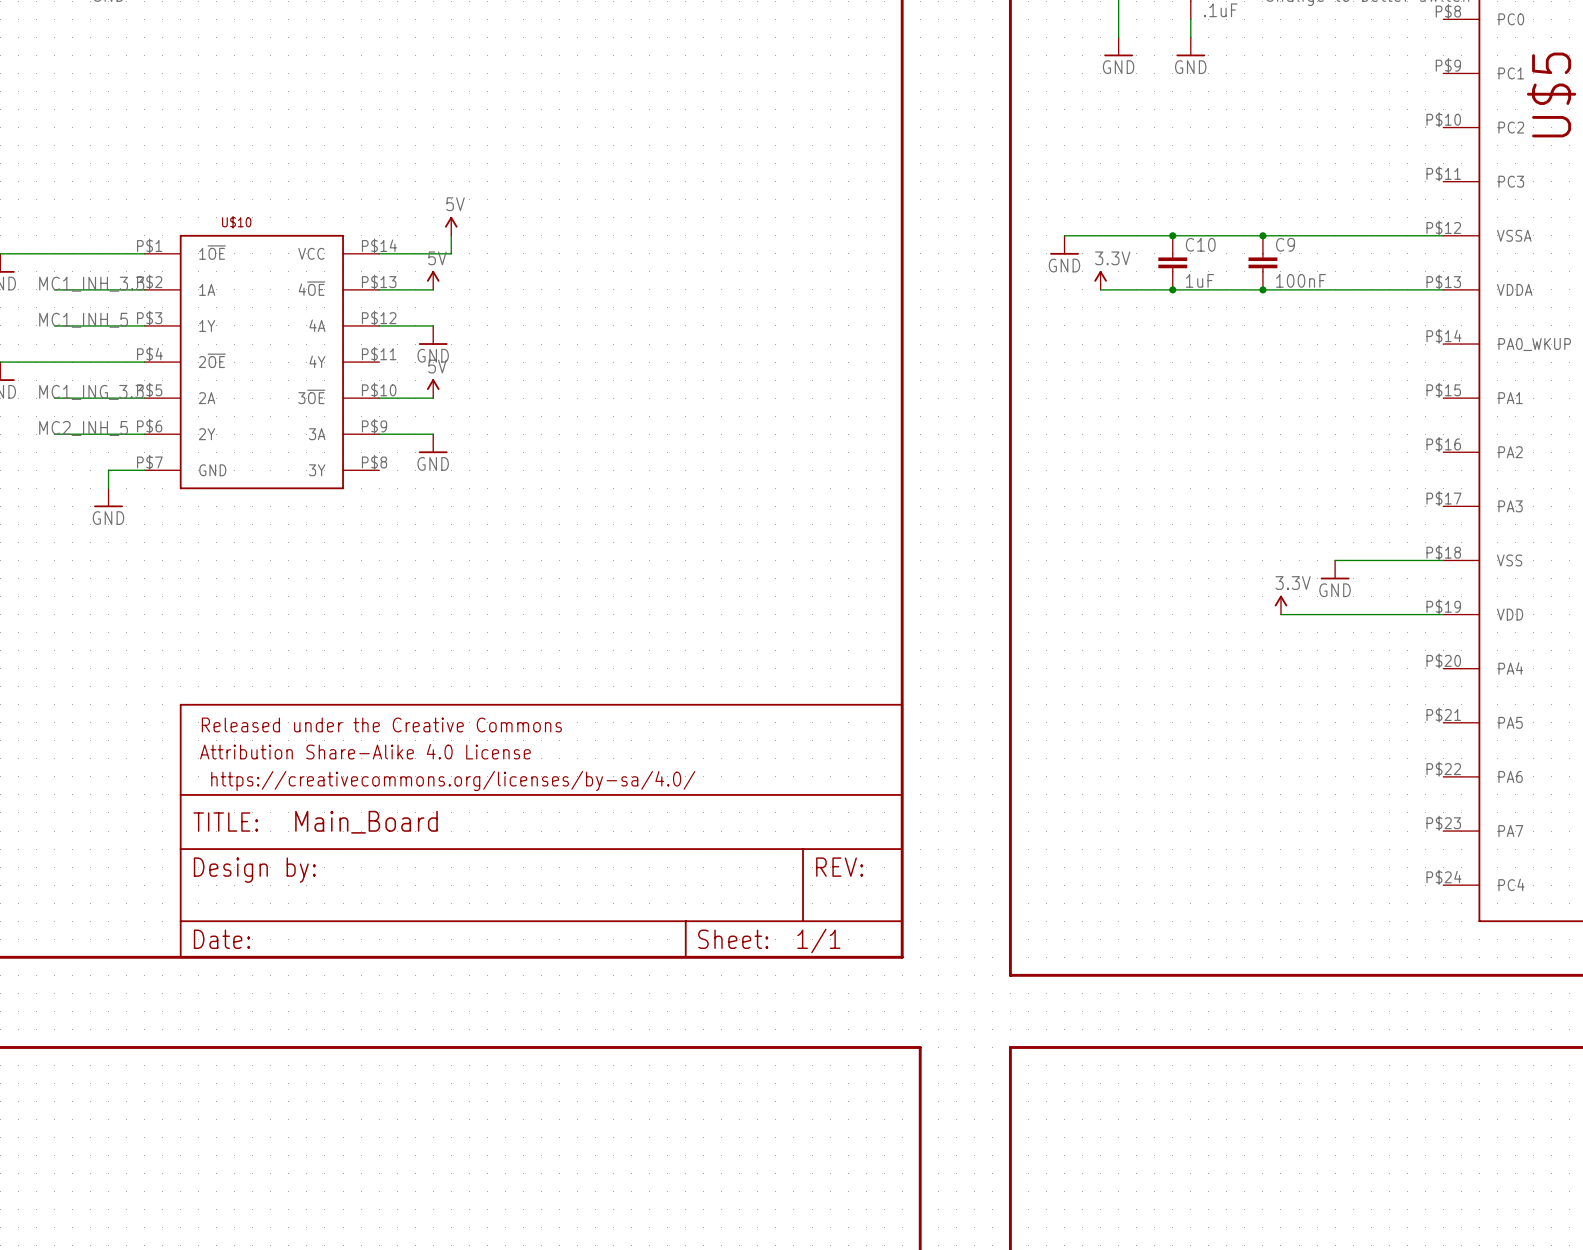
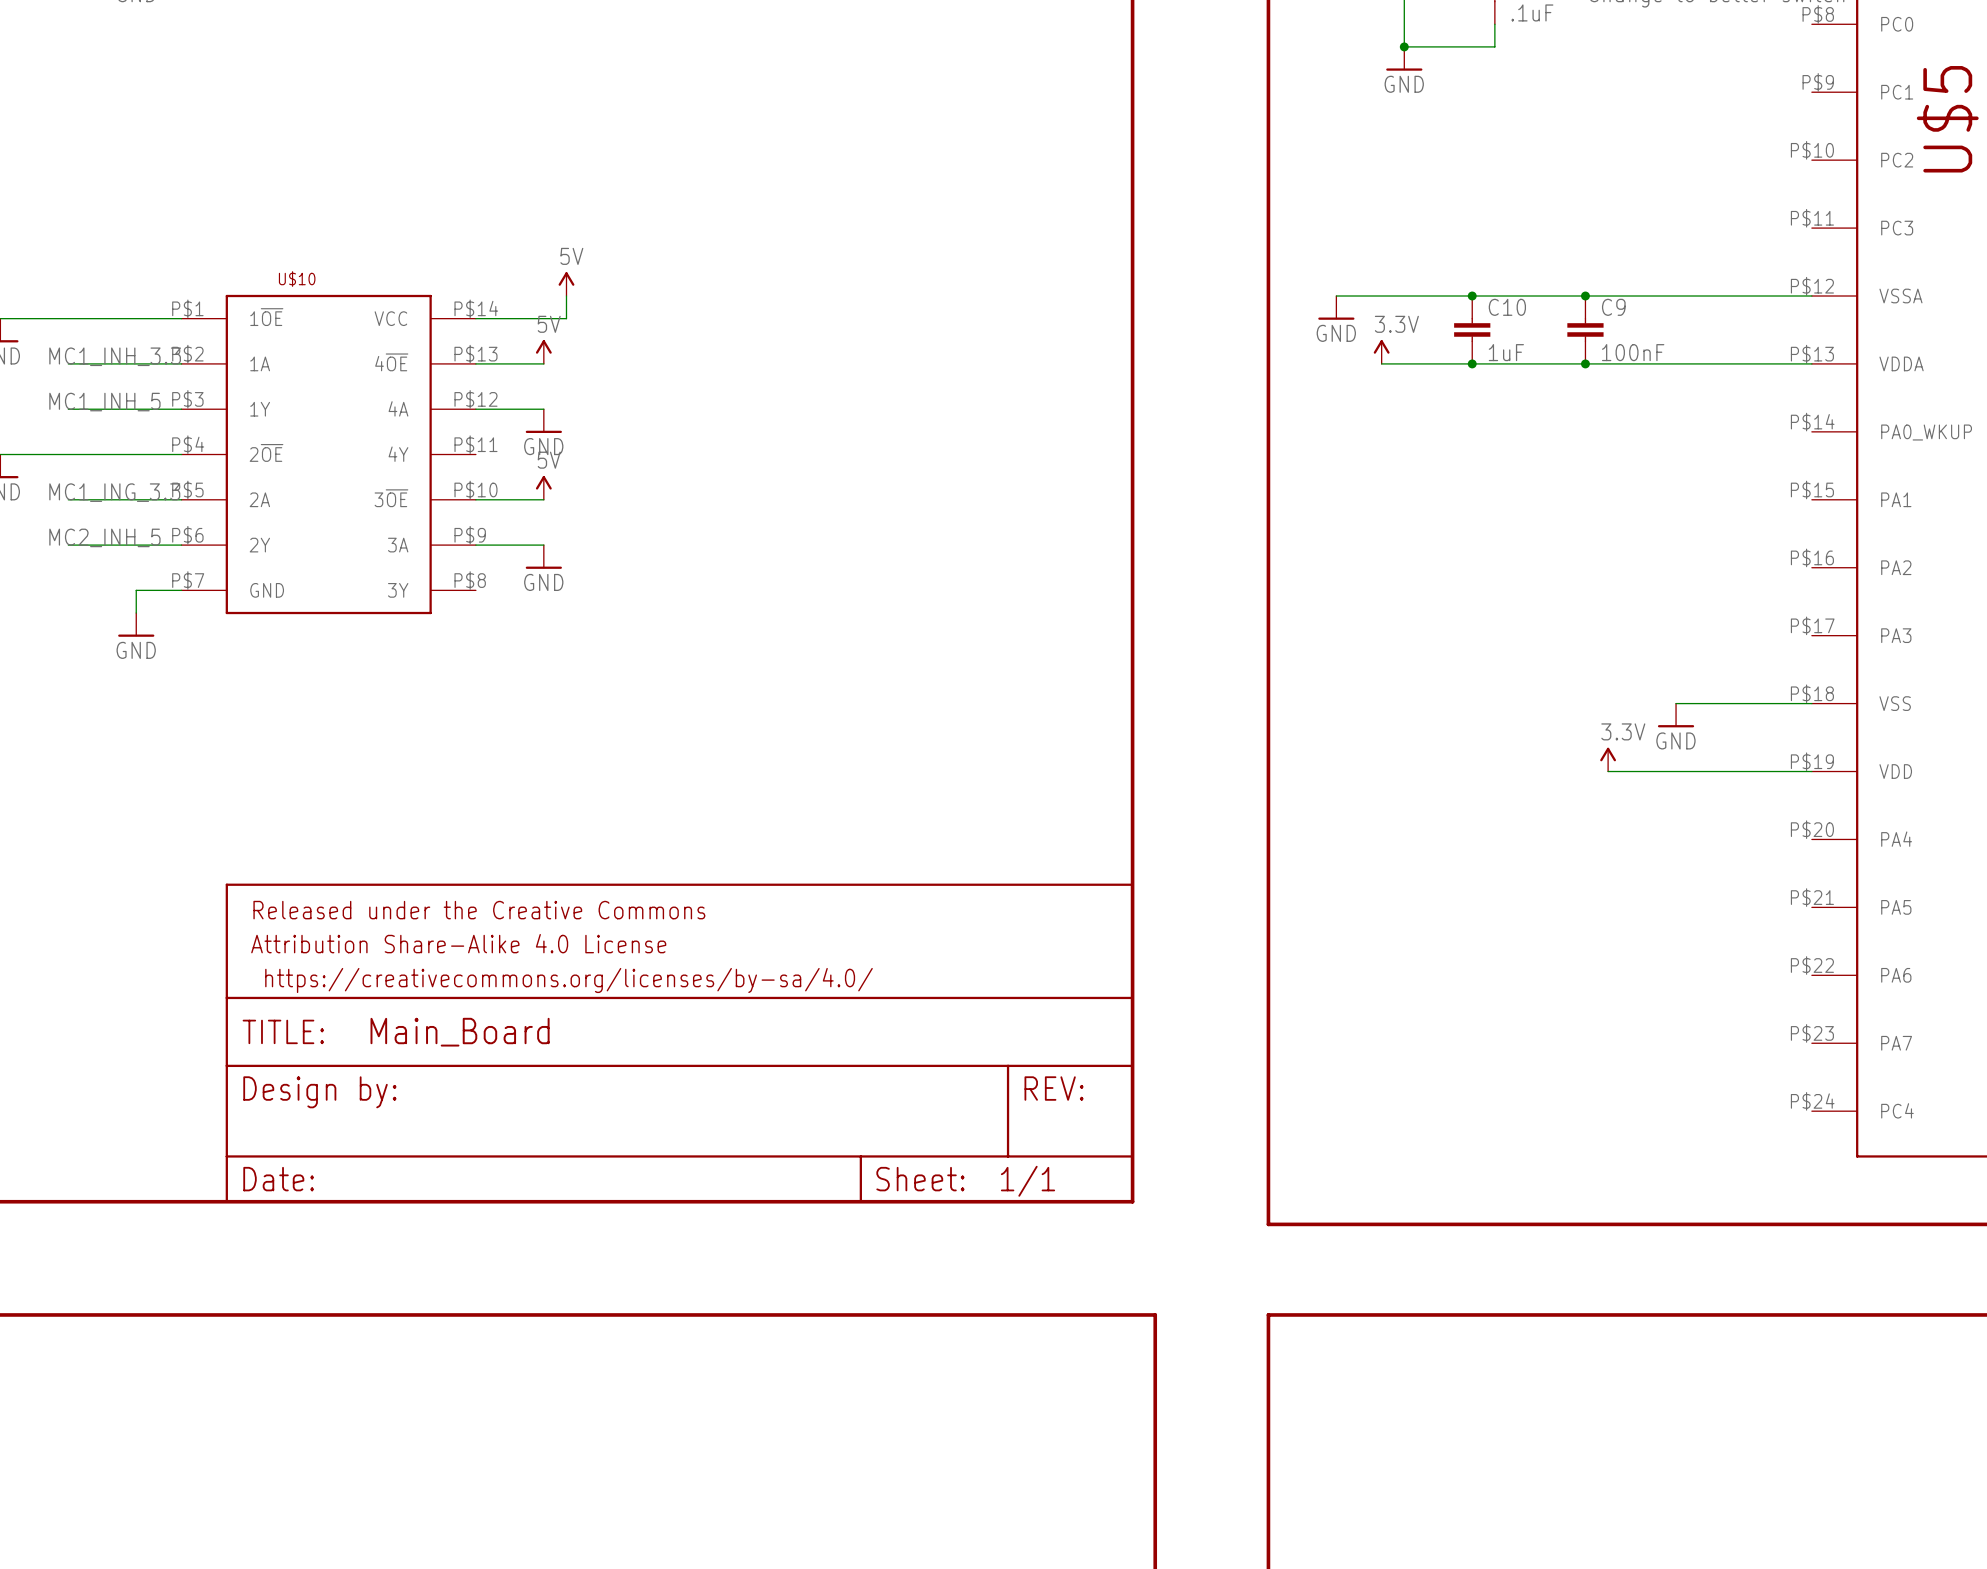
wire: none -> (1404, 46) (1494, 46)
junction: none -> (1404, 46)
power symbol: GND (1190, 46) -> none

